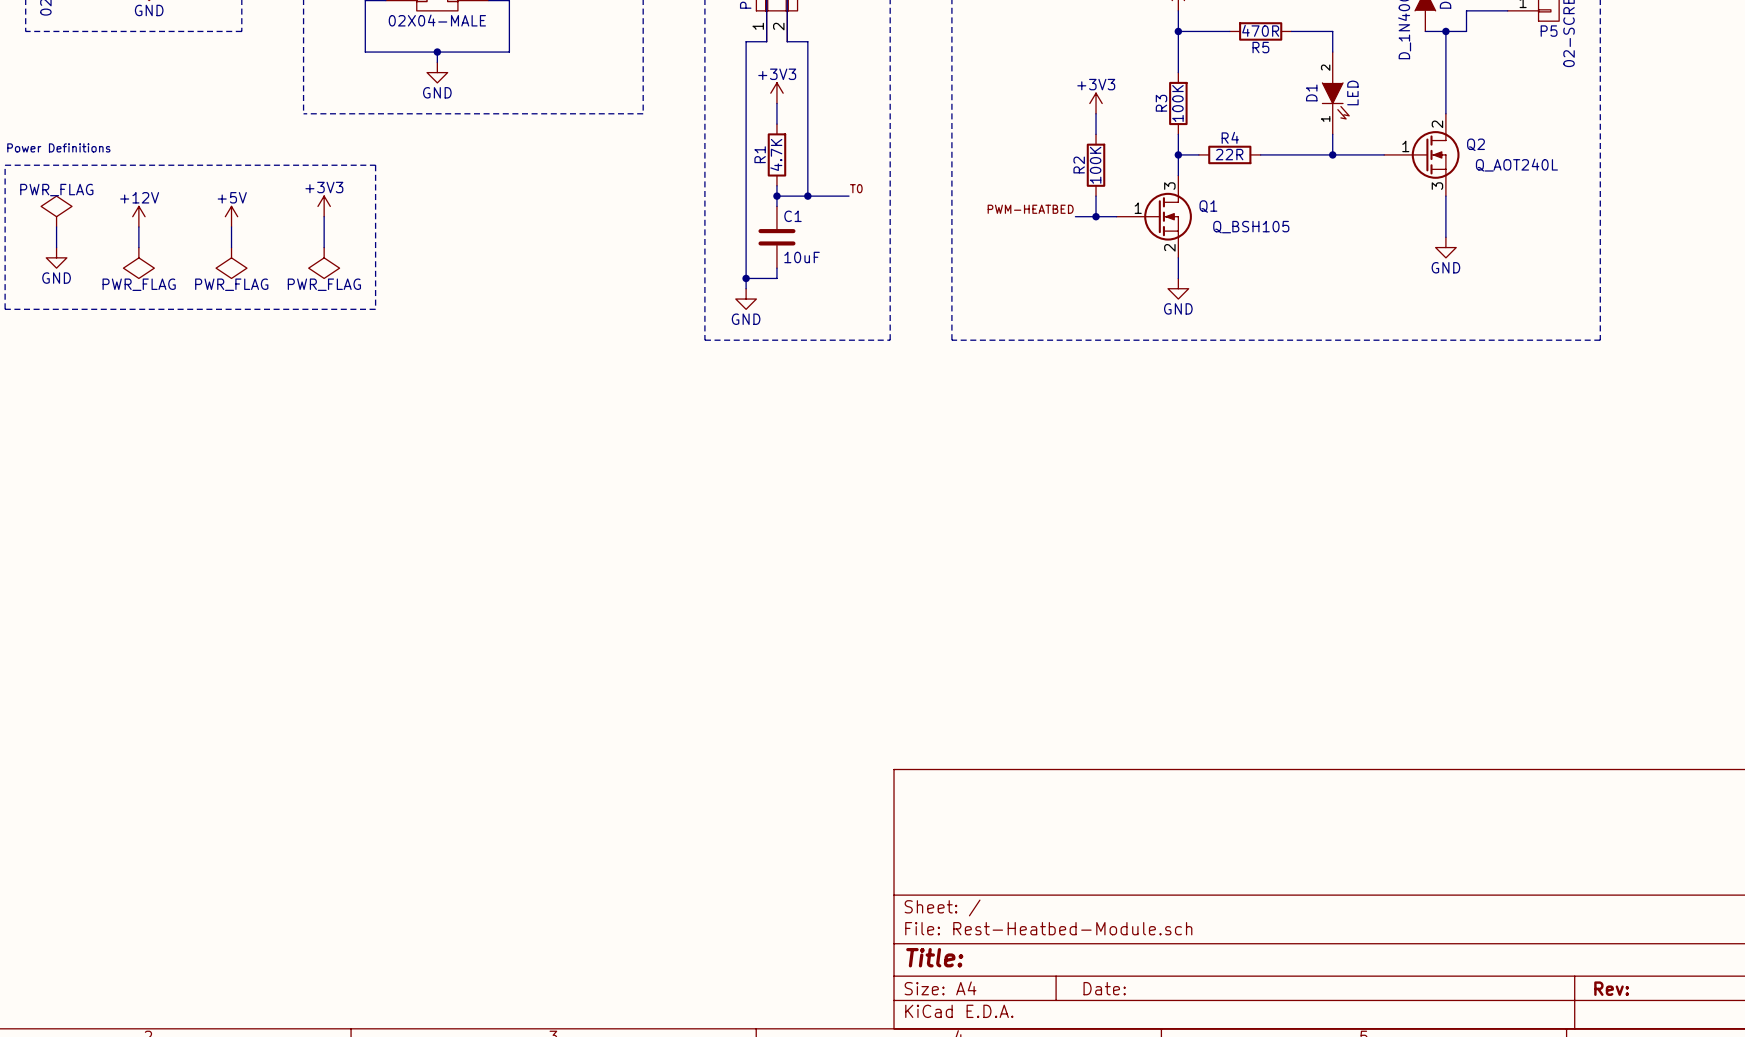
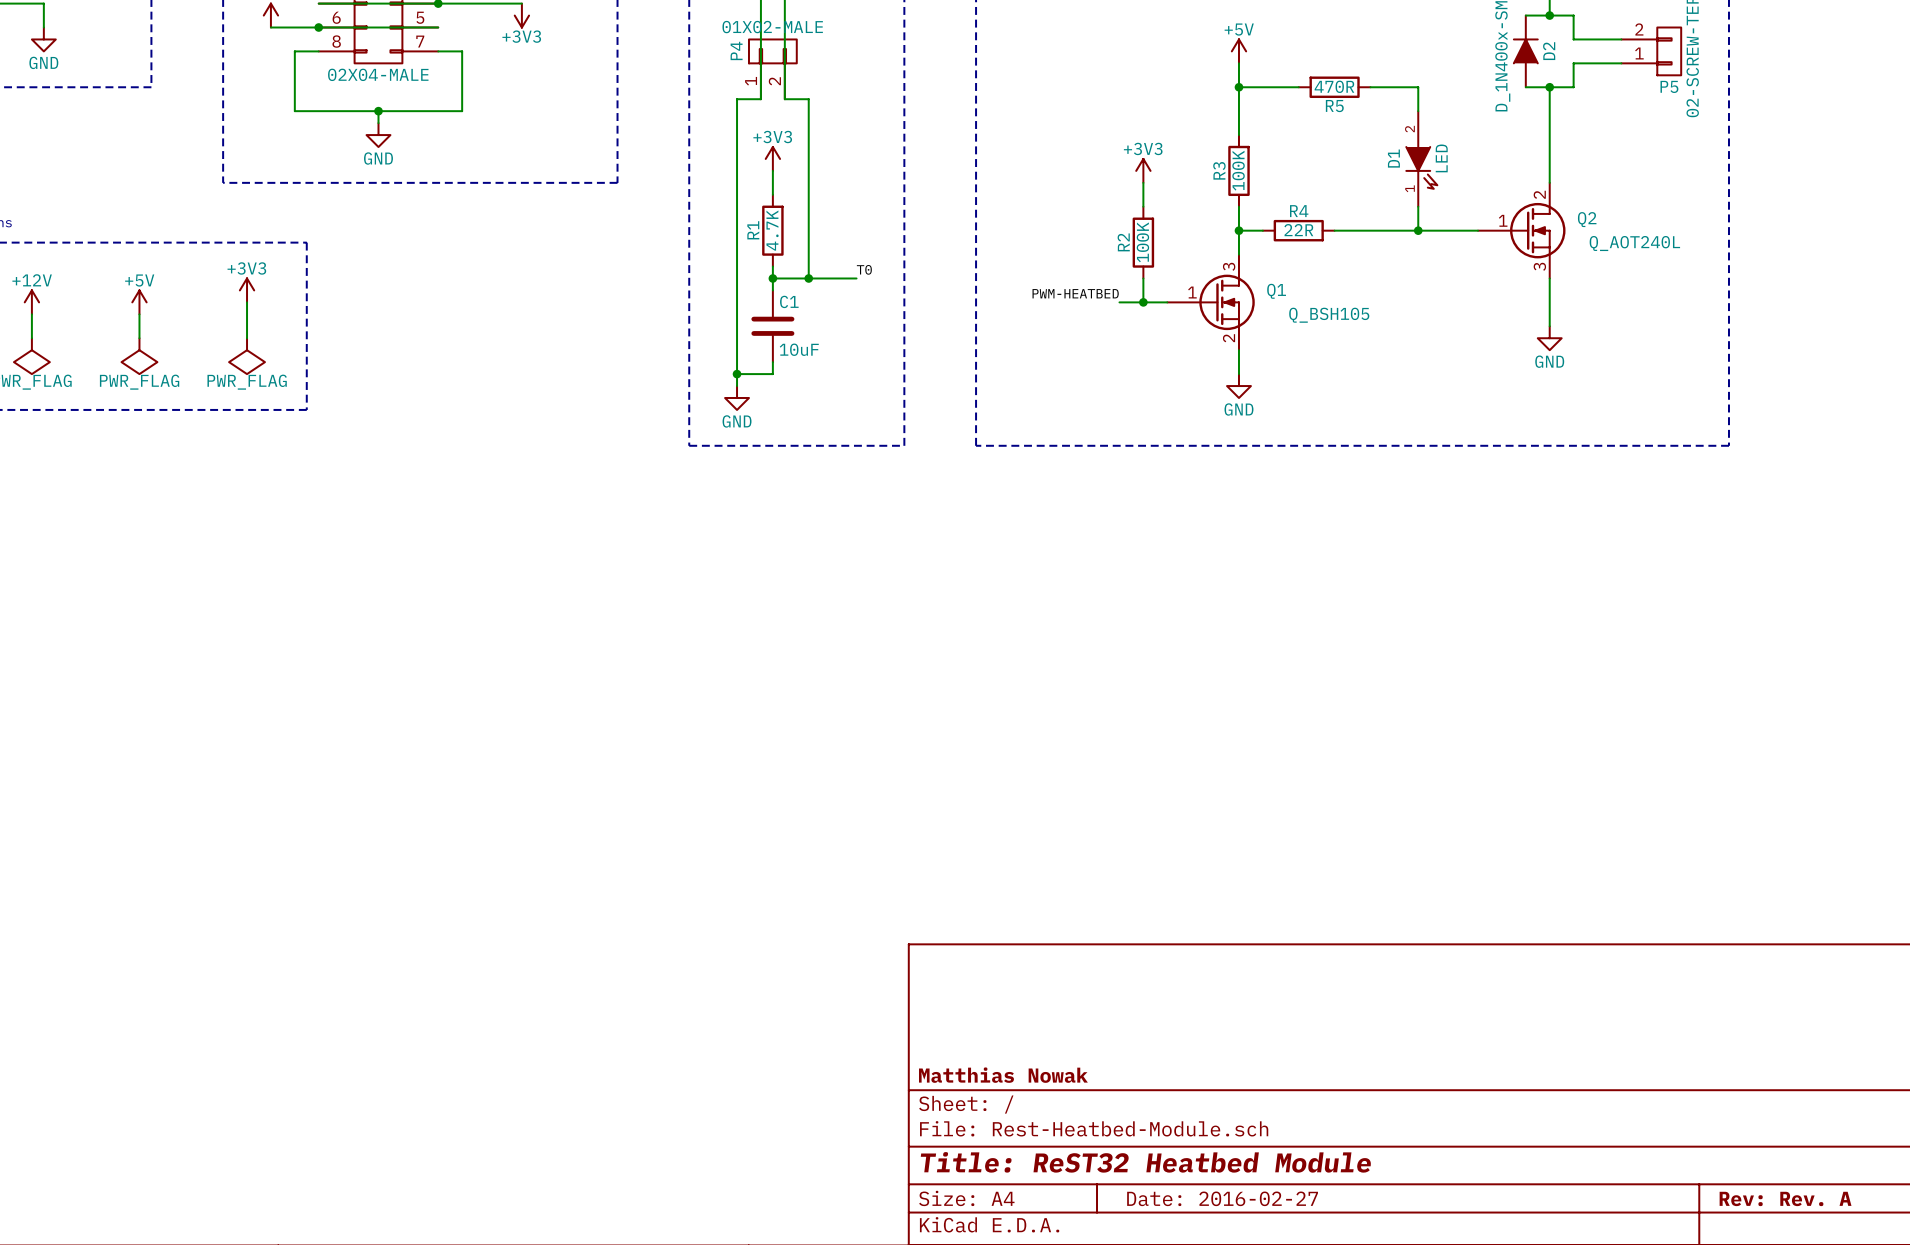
title block: none -> Matthias Nowak (1003, 1075)
title block: Title: (934, 957) -> Title: ReST32 Heatbed Module (1145, 1162)
title block: Date: (1104, 988) -> Date: 2016-02-27 (1222, 1198)
title block: Rev: (1611, 988) -> Rev: Rev. A (1785, 1198)

